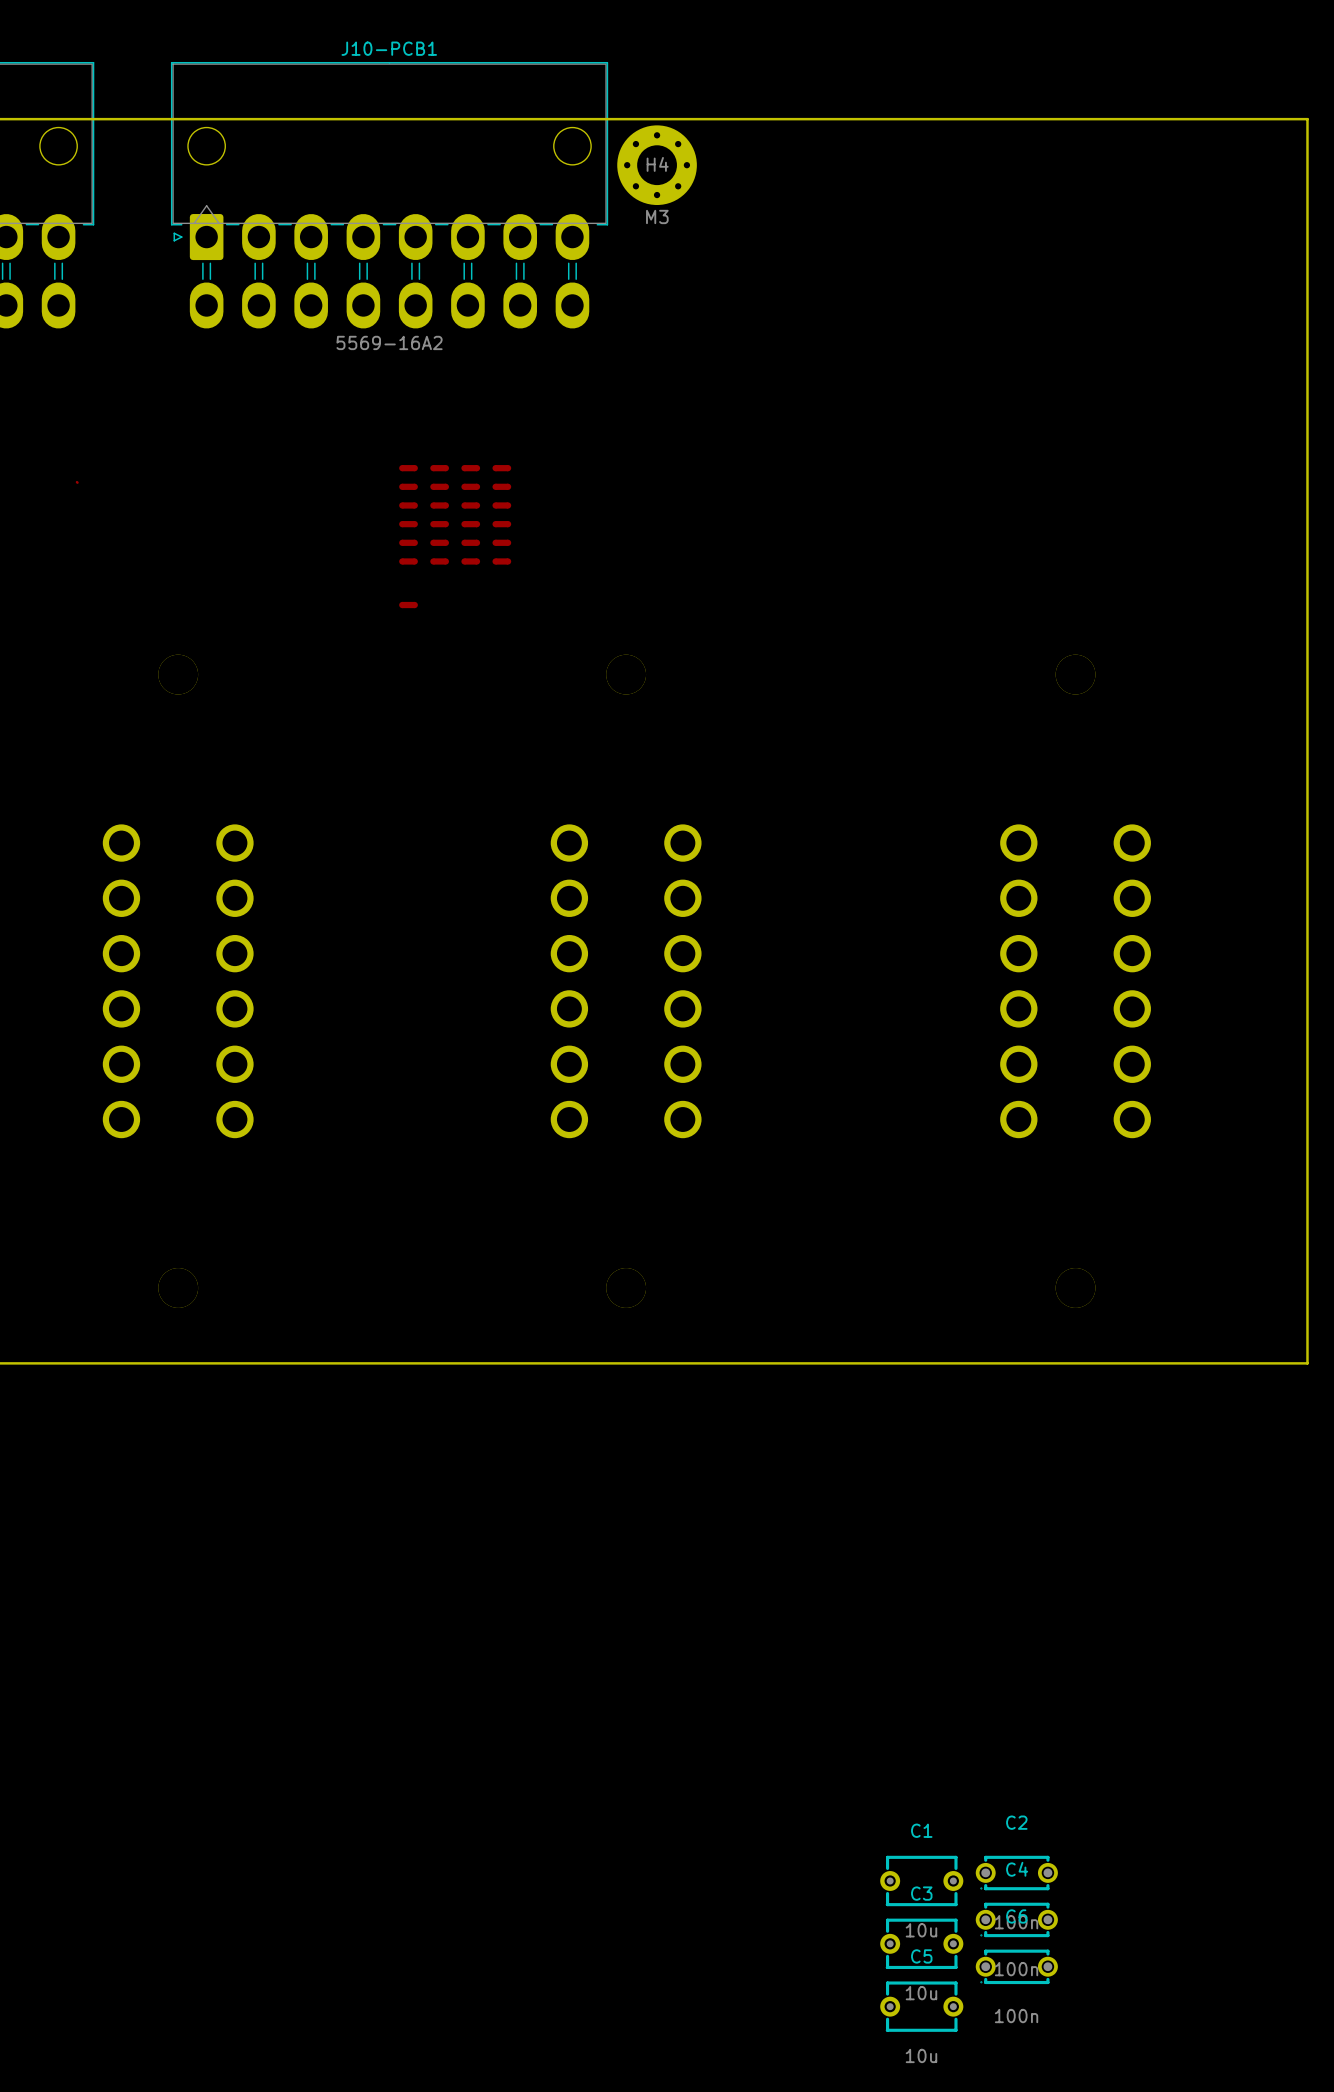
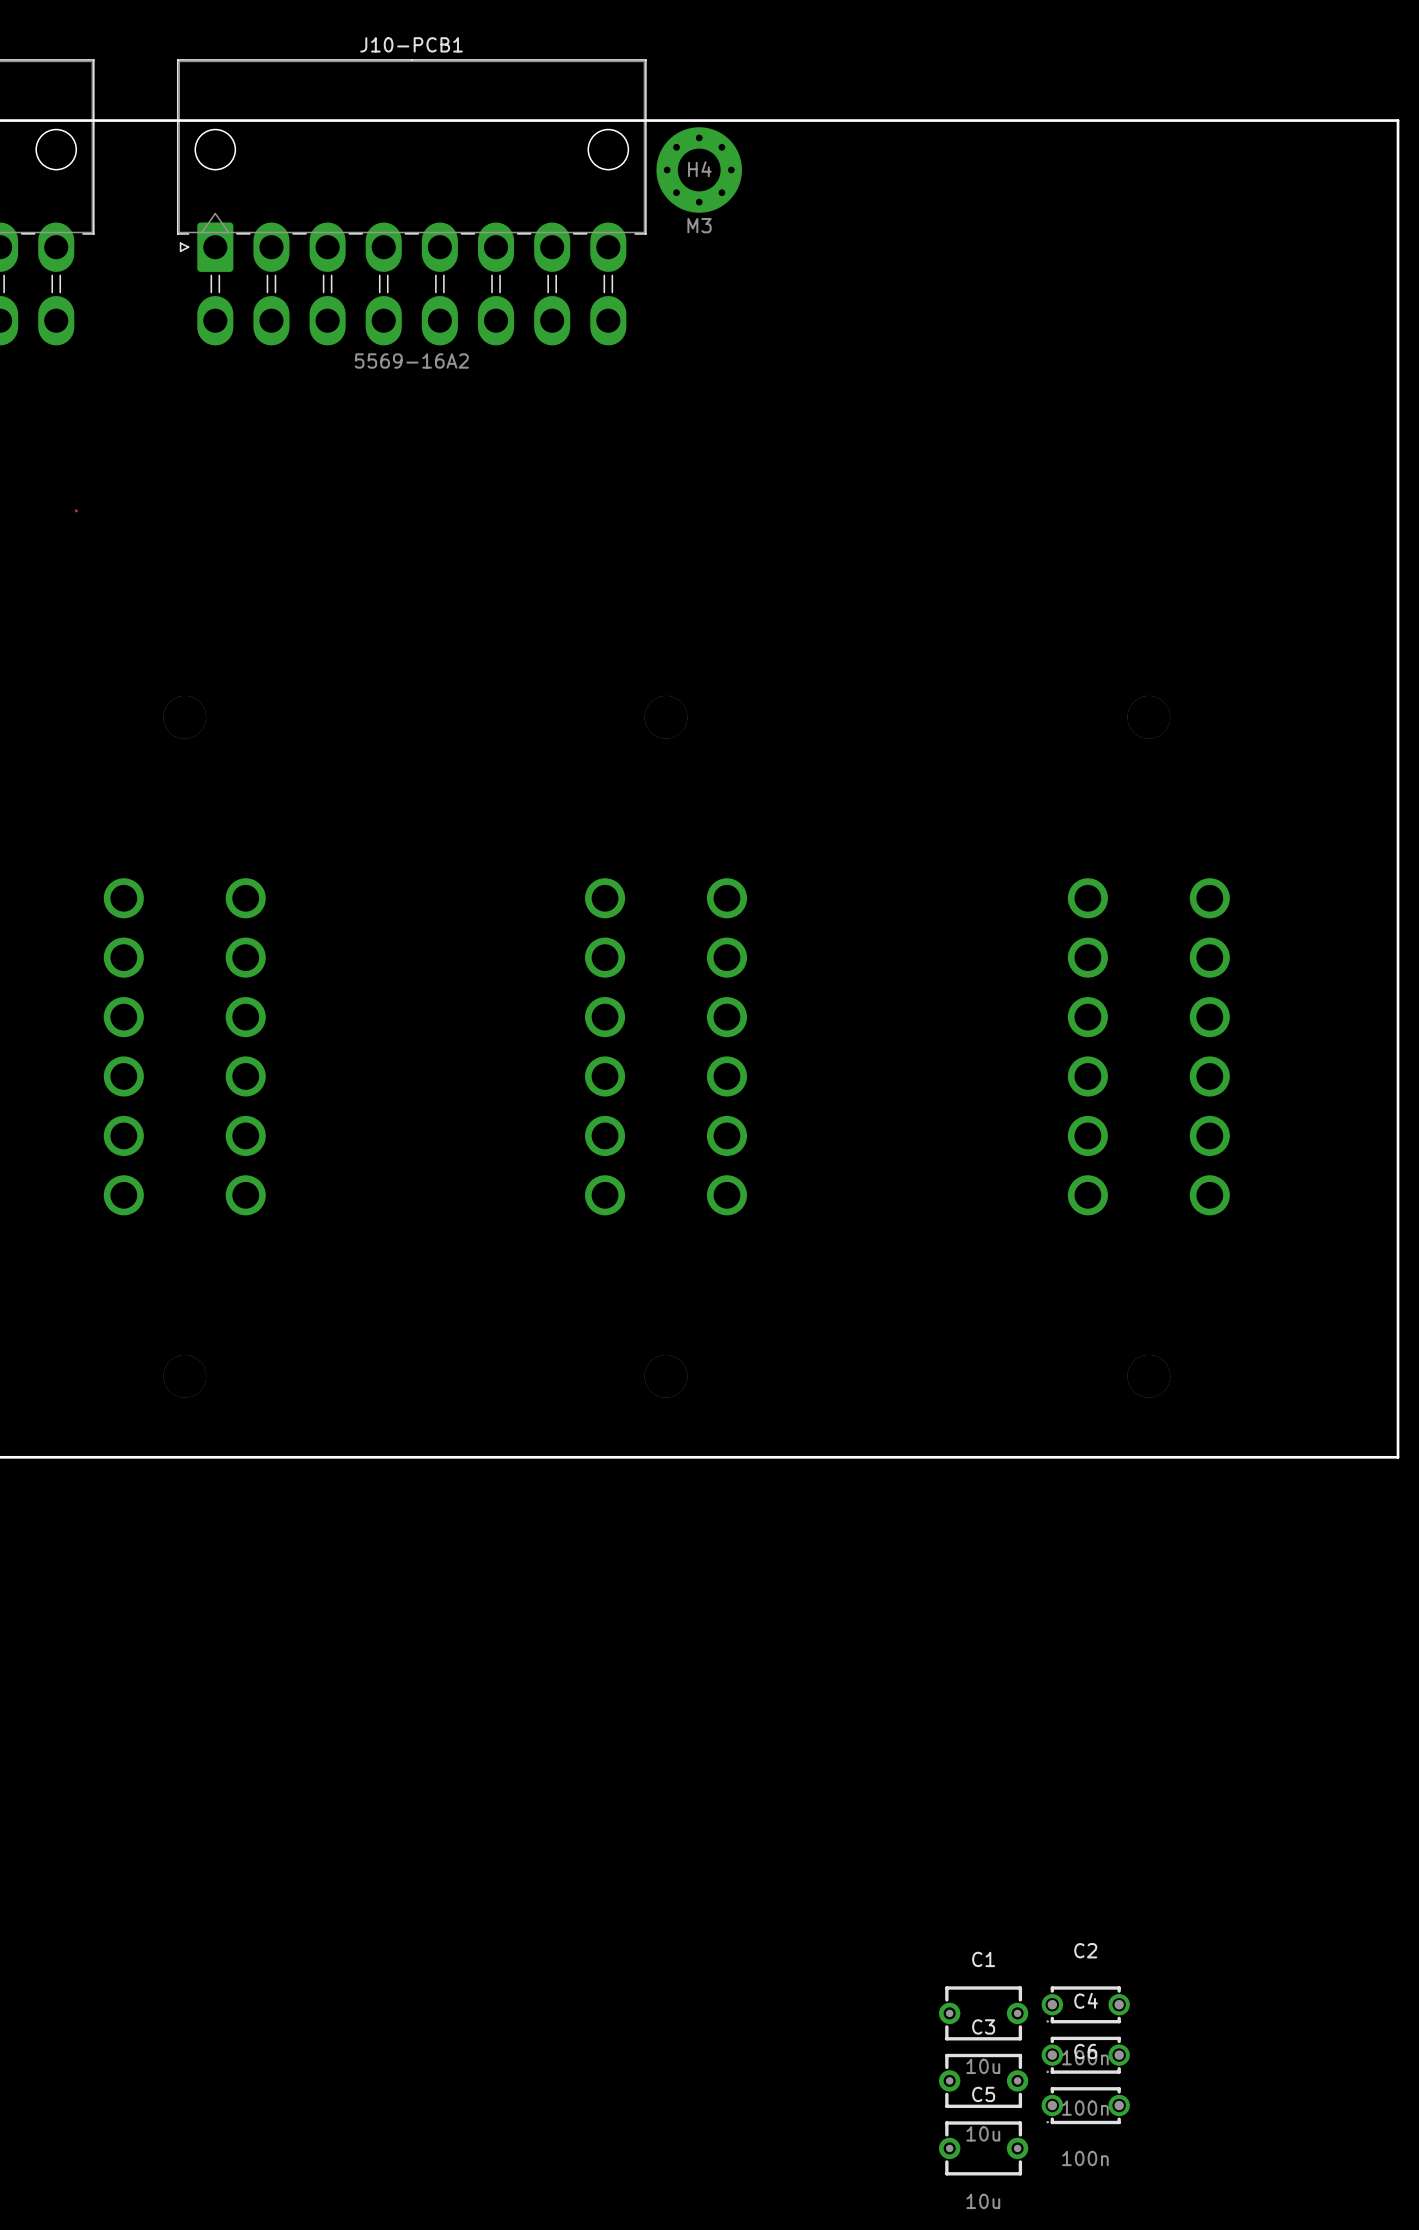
part: (408, 468) -> none
part: (439, 468) -> none
part: (470, 468) -> none
part: (501, 468) -> none
part: (408, 486) -> none
part: (439, 486) -> none
part: (470, 486) -> none
part: (501, 486) -> none
part: (408, 505) -> none
part: (439, 505) -> none
part: (470, 505) -> none
part: (501, 505) -> none
part: (408, 524) -> none
part: (439, 524) -> none
part: (470, 524) -> none
part: (501, 524) -> none
part: (408, 542) -> none
part: (439, 542) -> none
part: (470, 542) -> none
part: (501, 542) -> none
part: (408, 561) -> none
part: (439, 561) -> none
part: (470, 561) -> none
part: (501, 561) -> none
part: (408, 605) -> none

